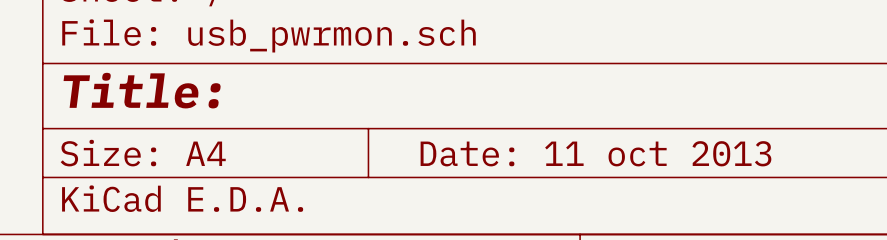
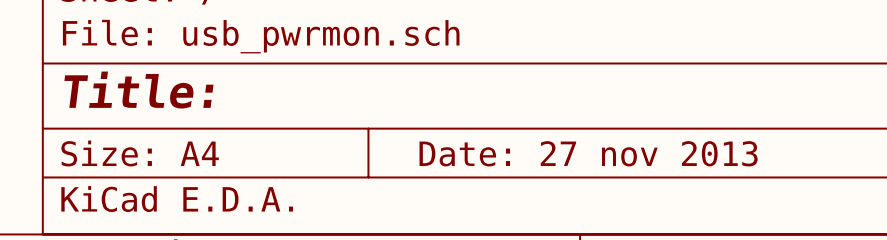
title block: Date: 11 oct 2013 (595, 153) -> Date: 27 nov 2013 (588, 153)

